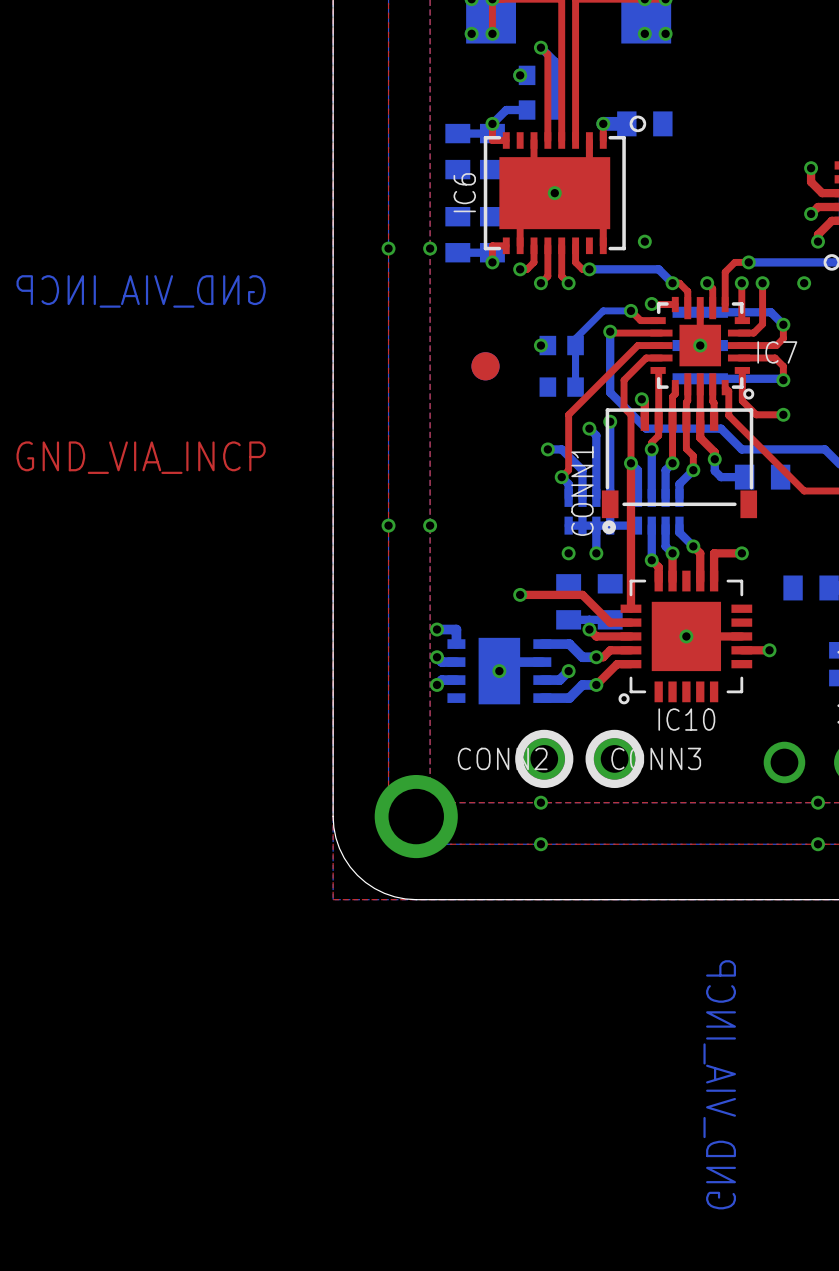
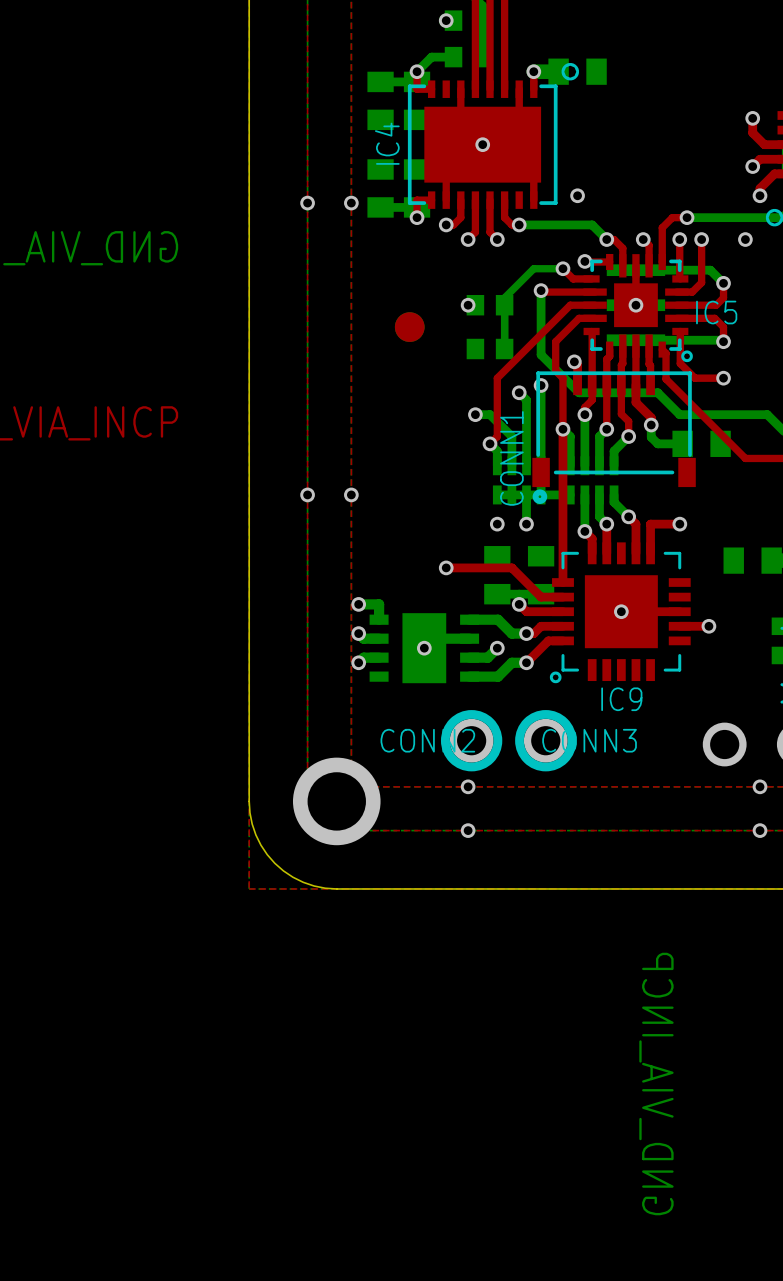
IC6 name: IC6 (464, 192) -> IC4 (387, 143)
IC7 name: IC7 (777, 352) -> IC5 (716, 312)
IC10 name: IC10 (686, 719) -> IC9 (621, 699)

